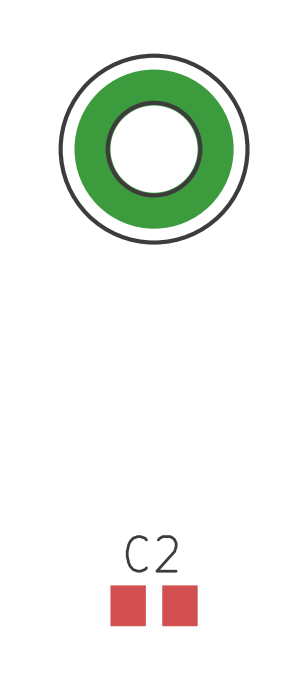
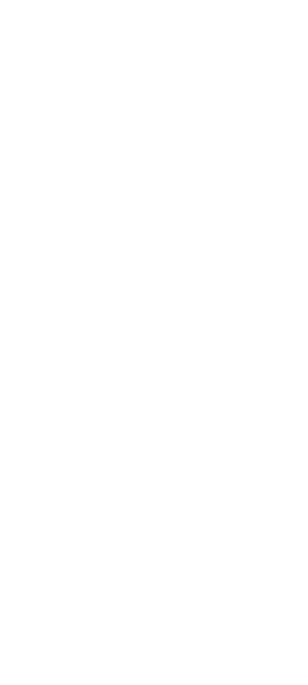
part: (154, 149) -> none
C2: (154, 605) -> none

